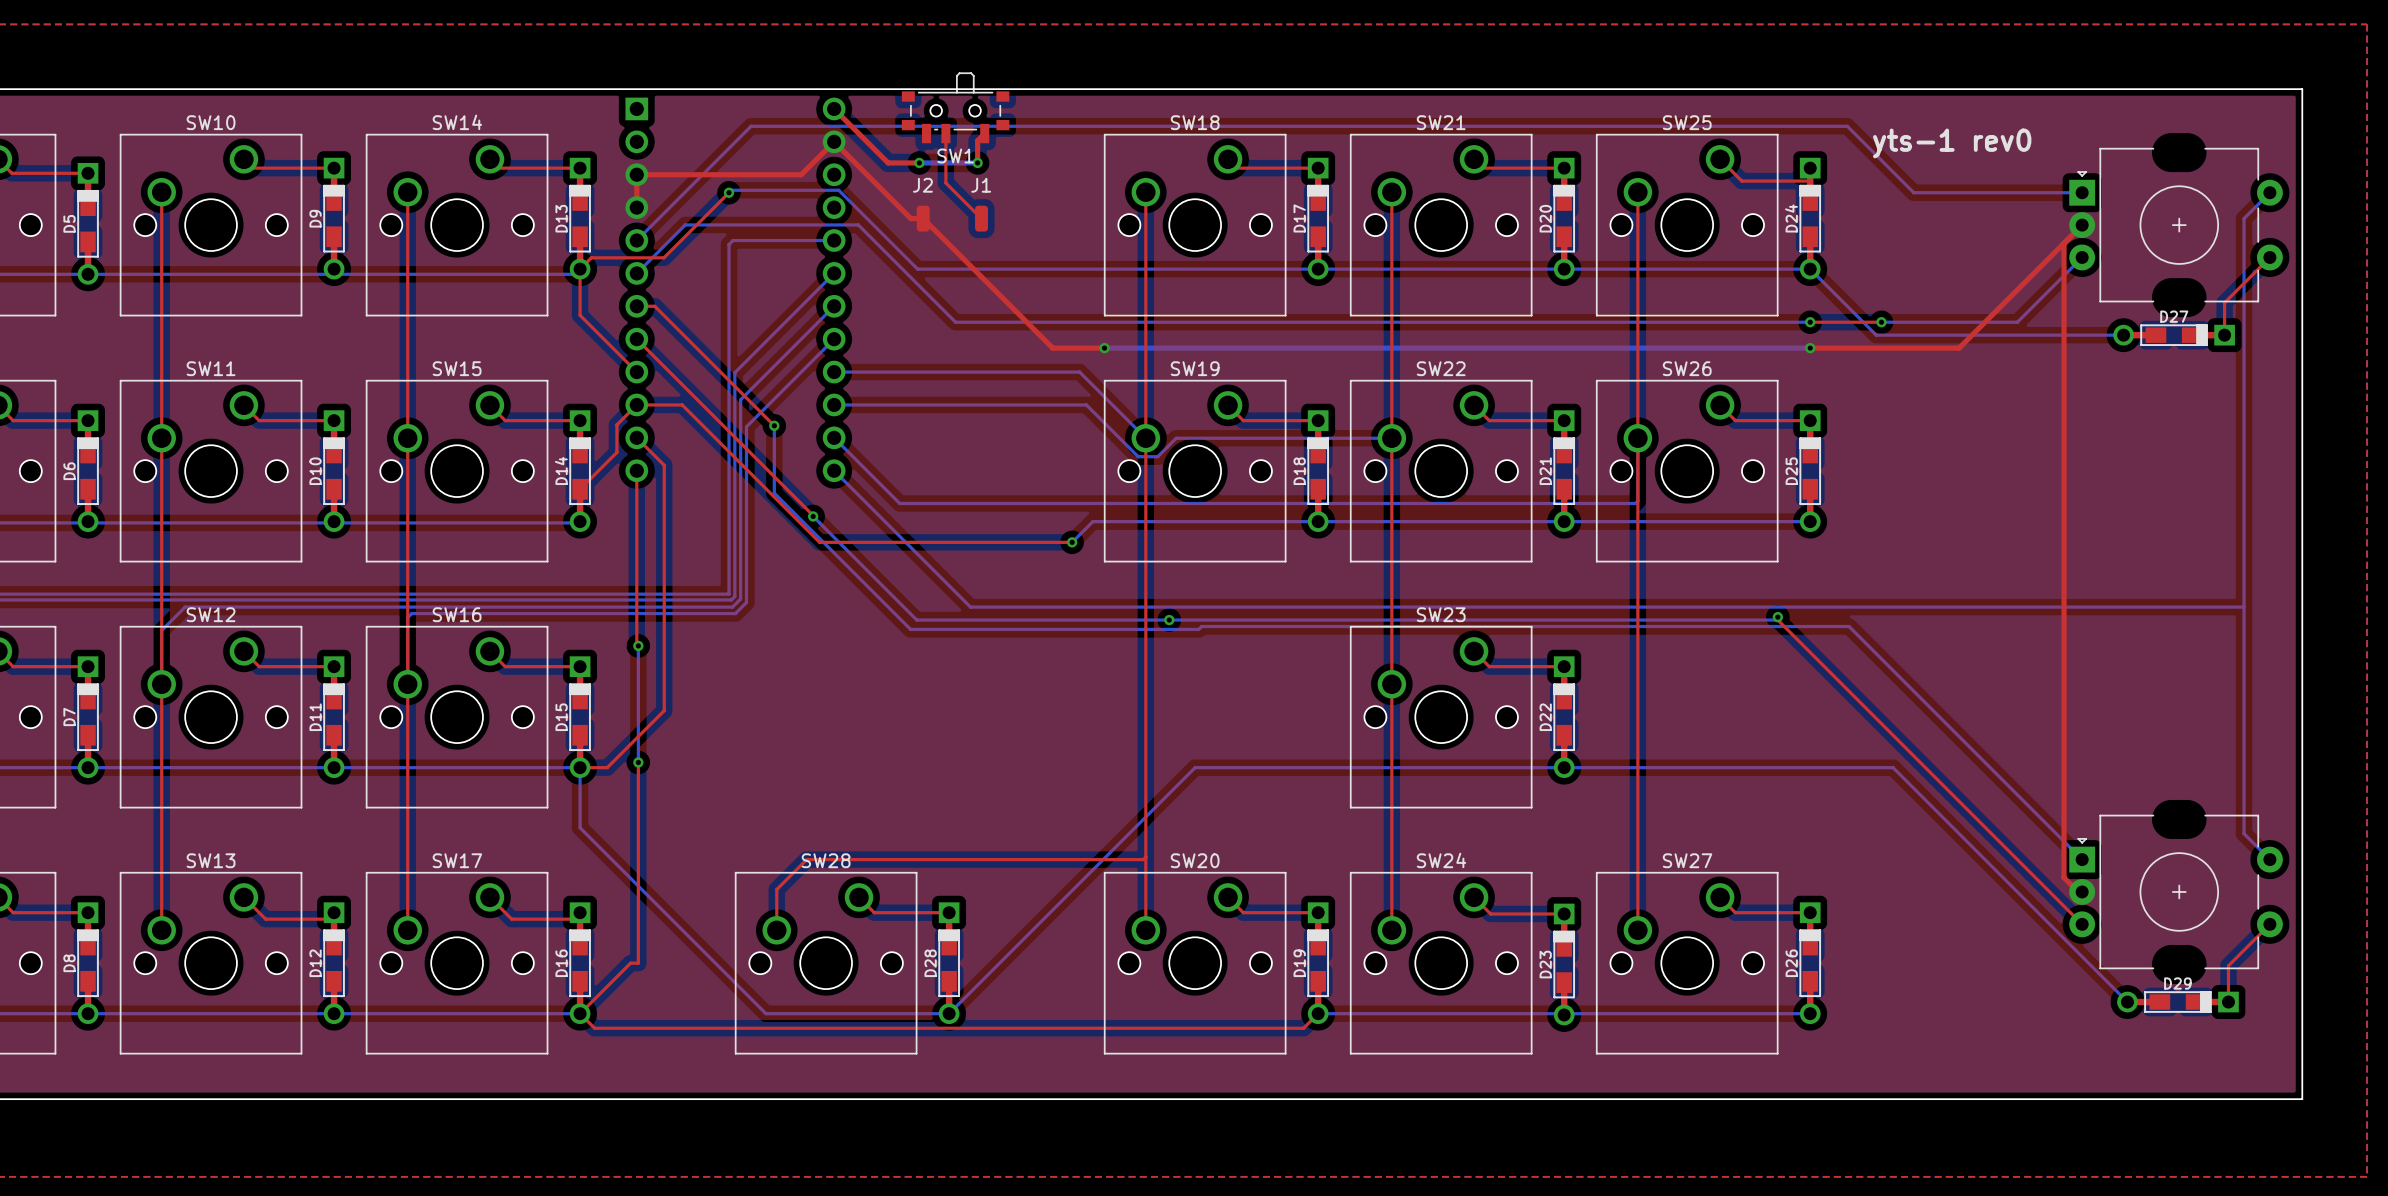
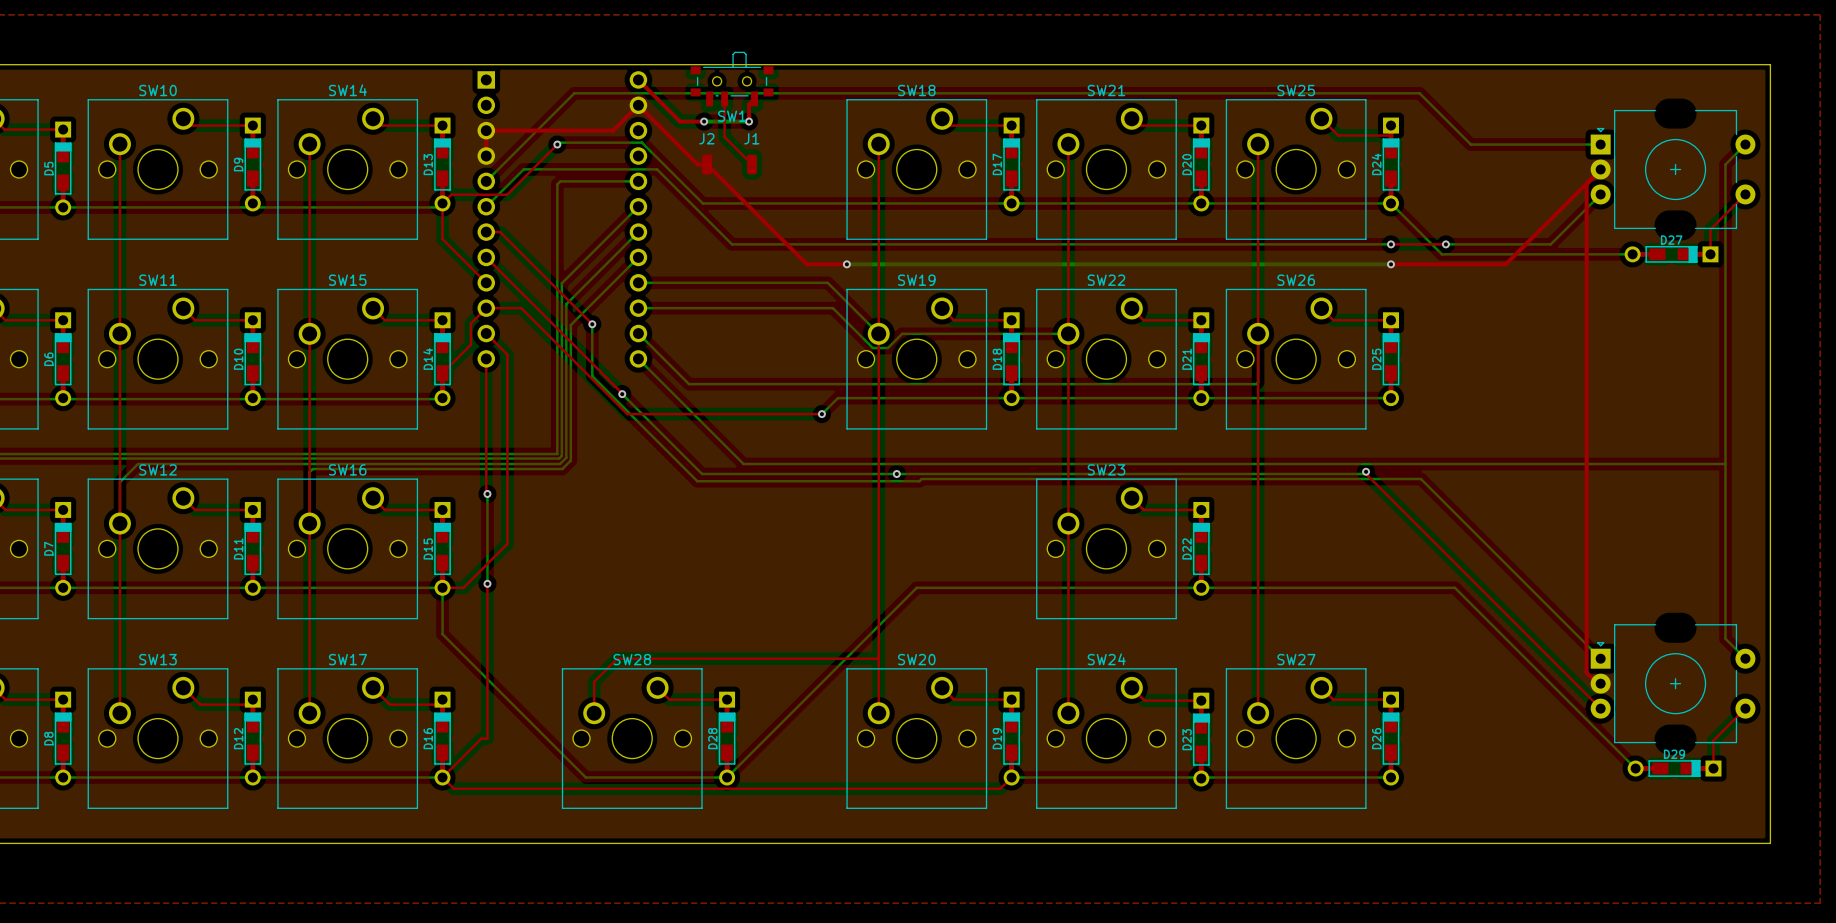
text: yts-1 rev0 (1952, 143) -> none

